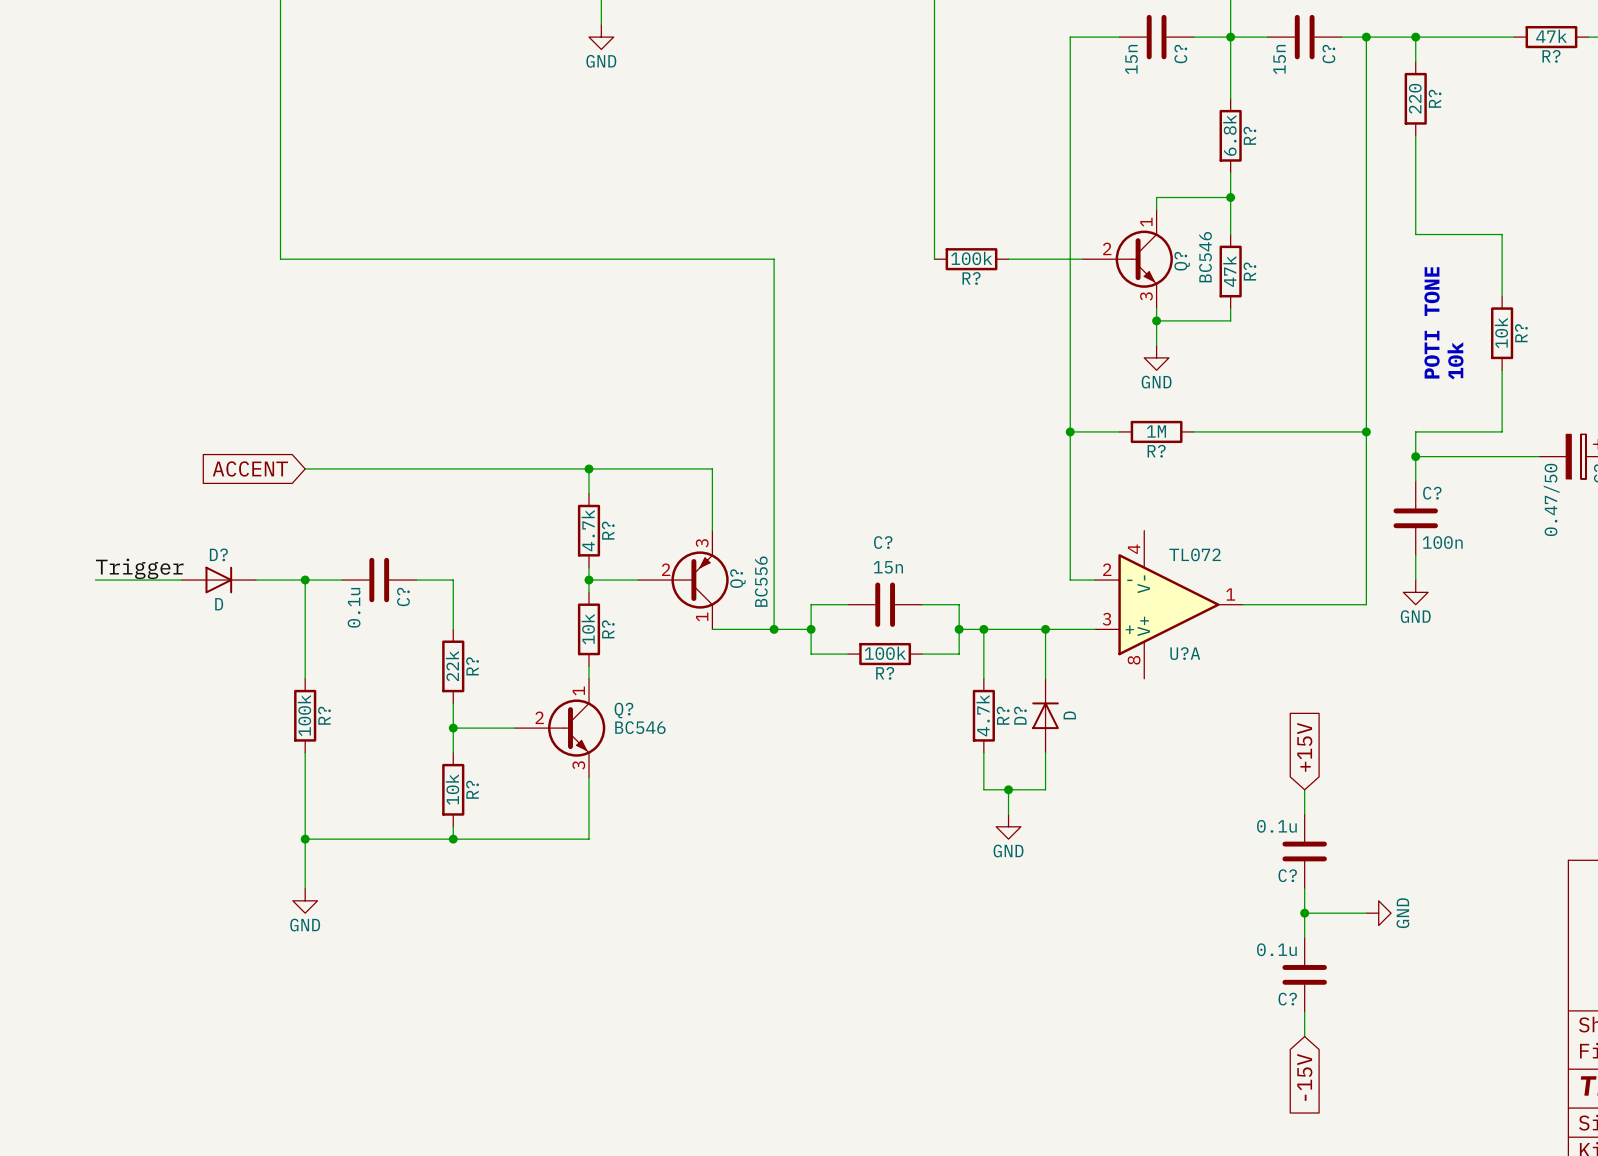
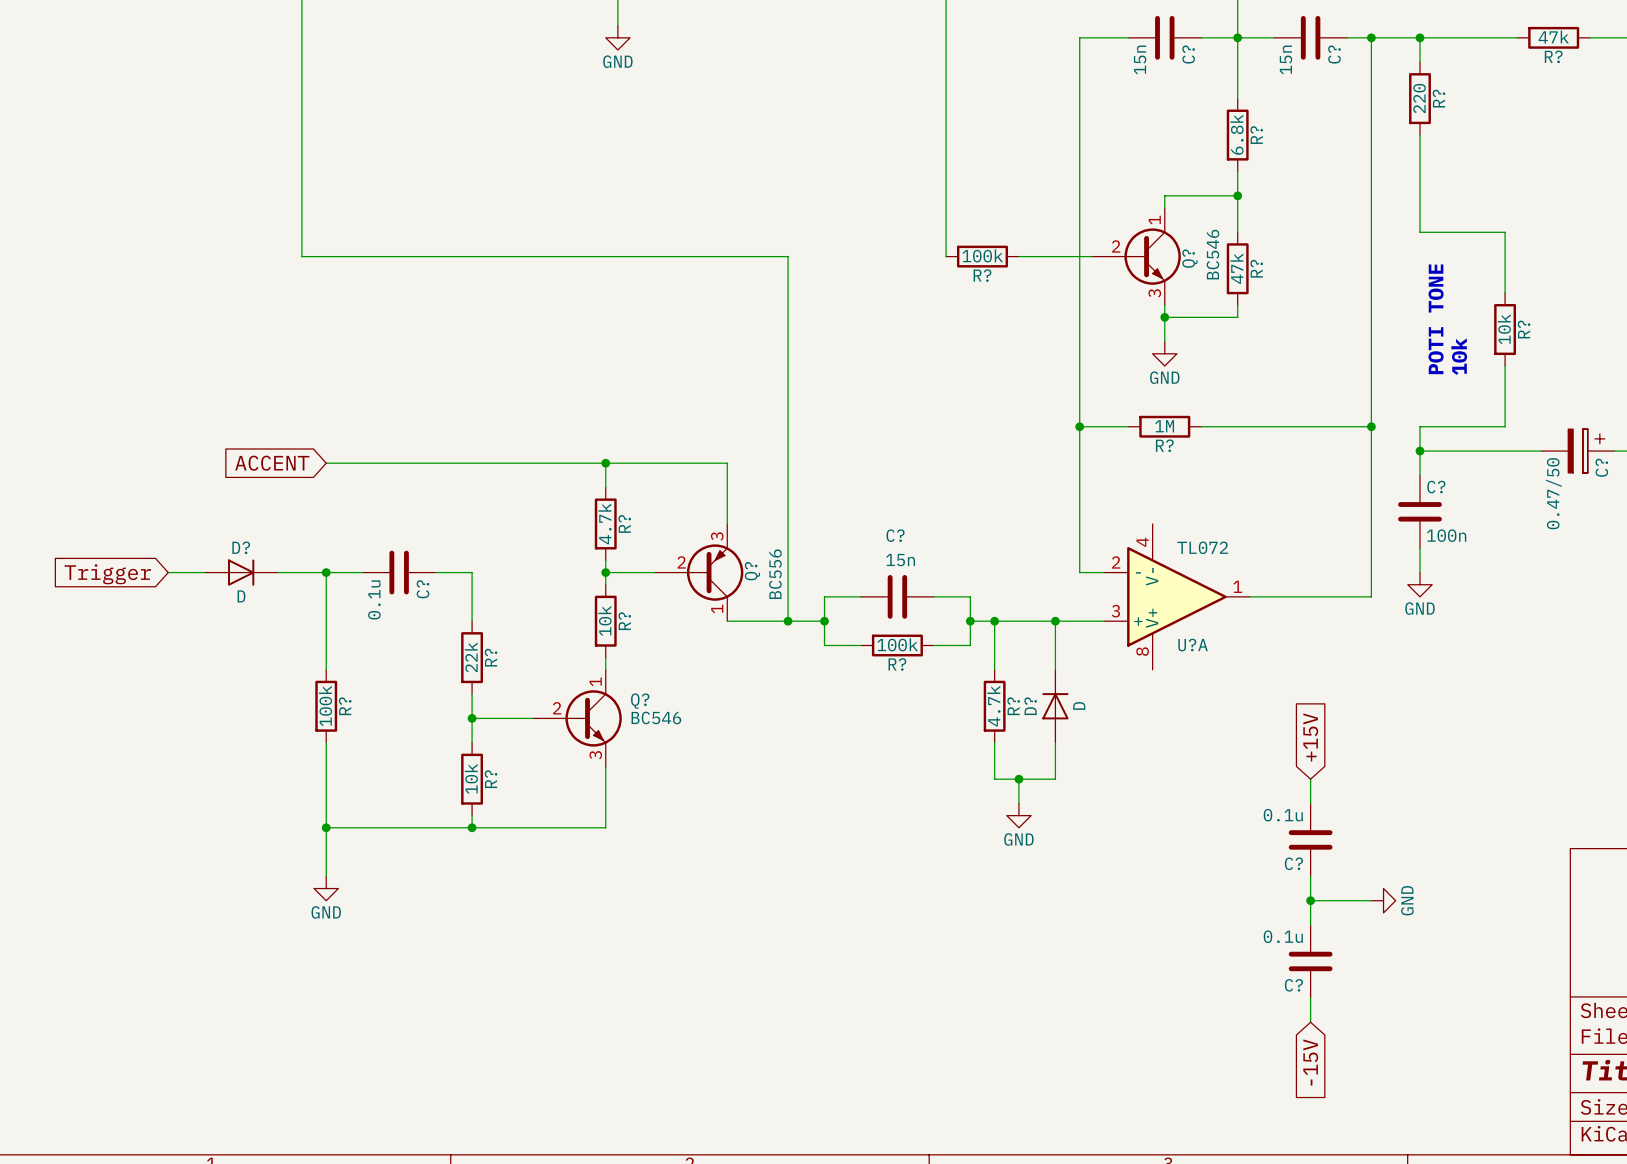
label: Trigger (139, 568) -> none
wire: (95, 580) (144, 580) -> none
global label: none -> Trigger (107, 574)

